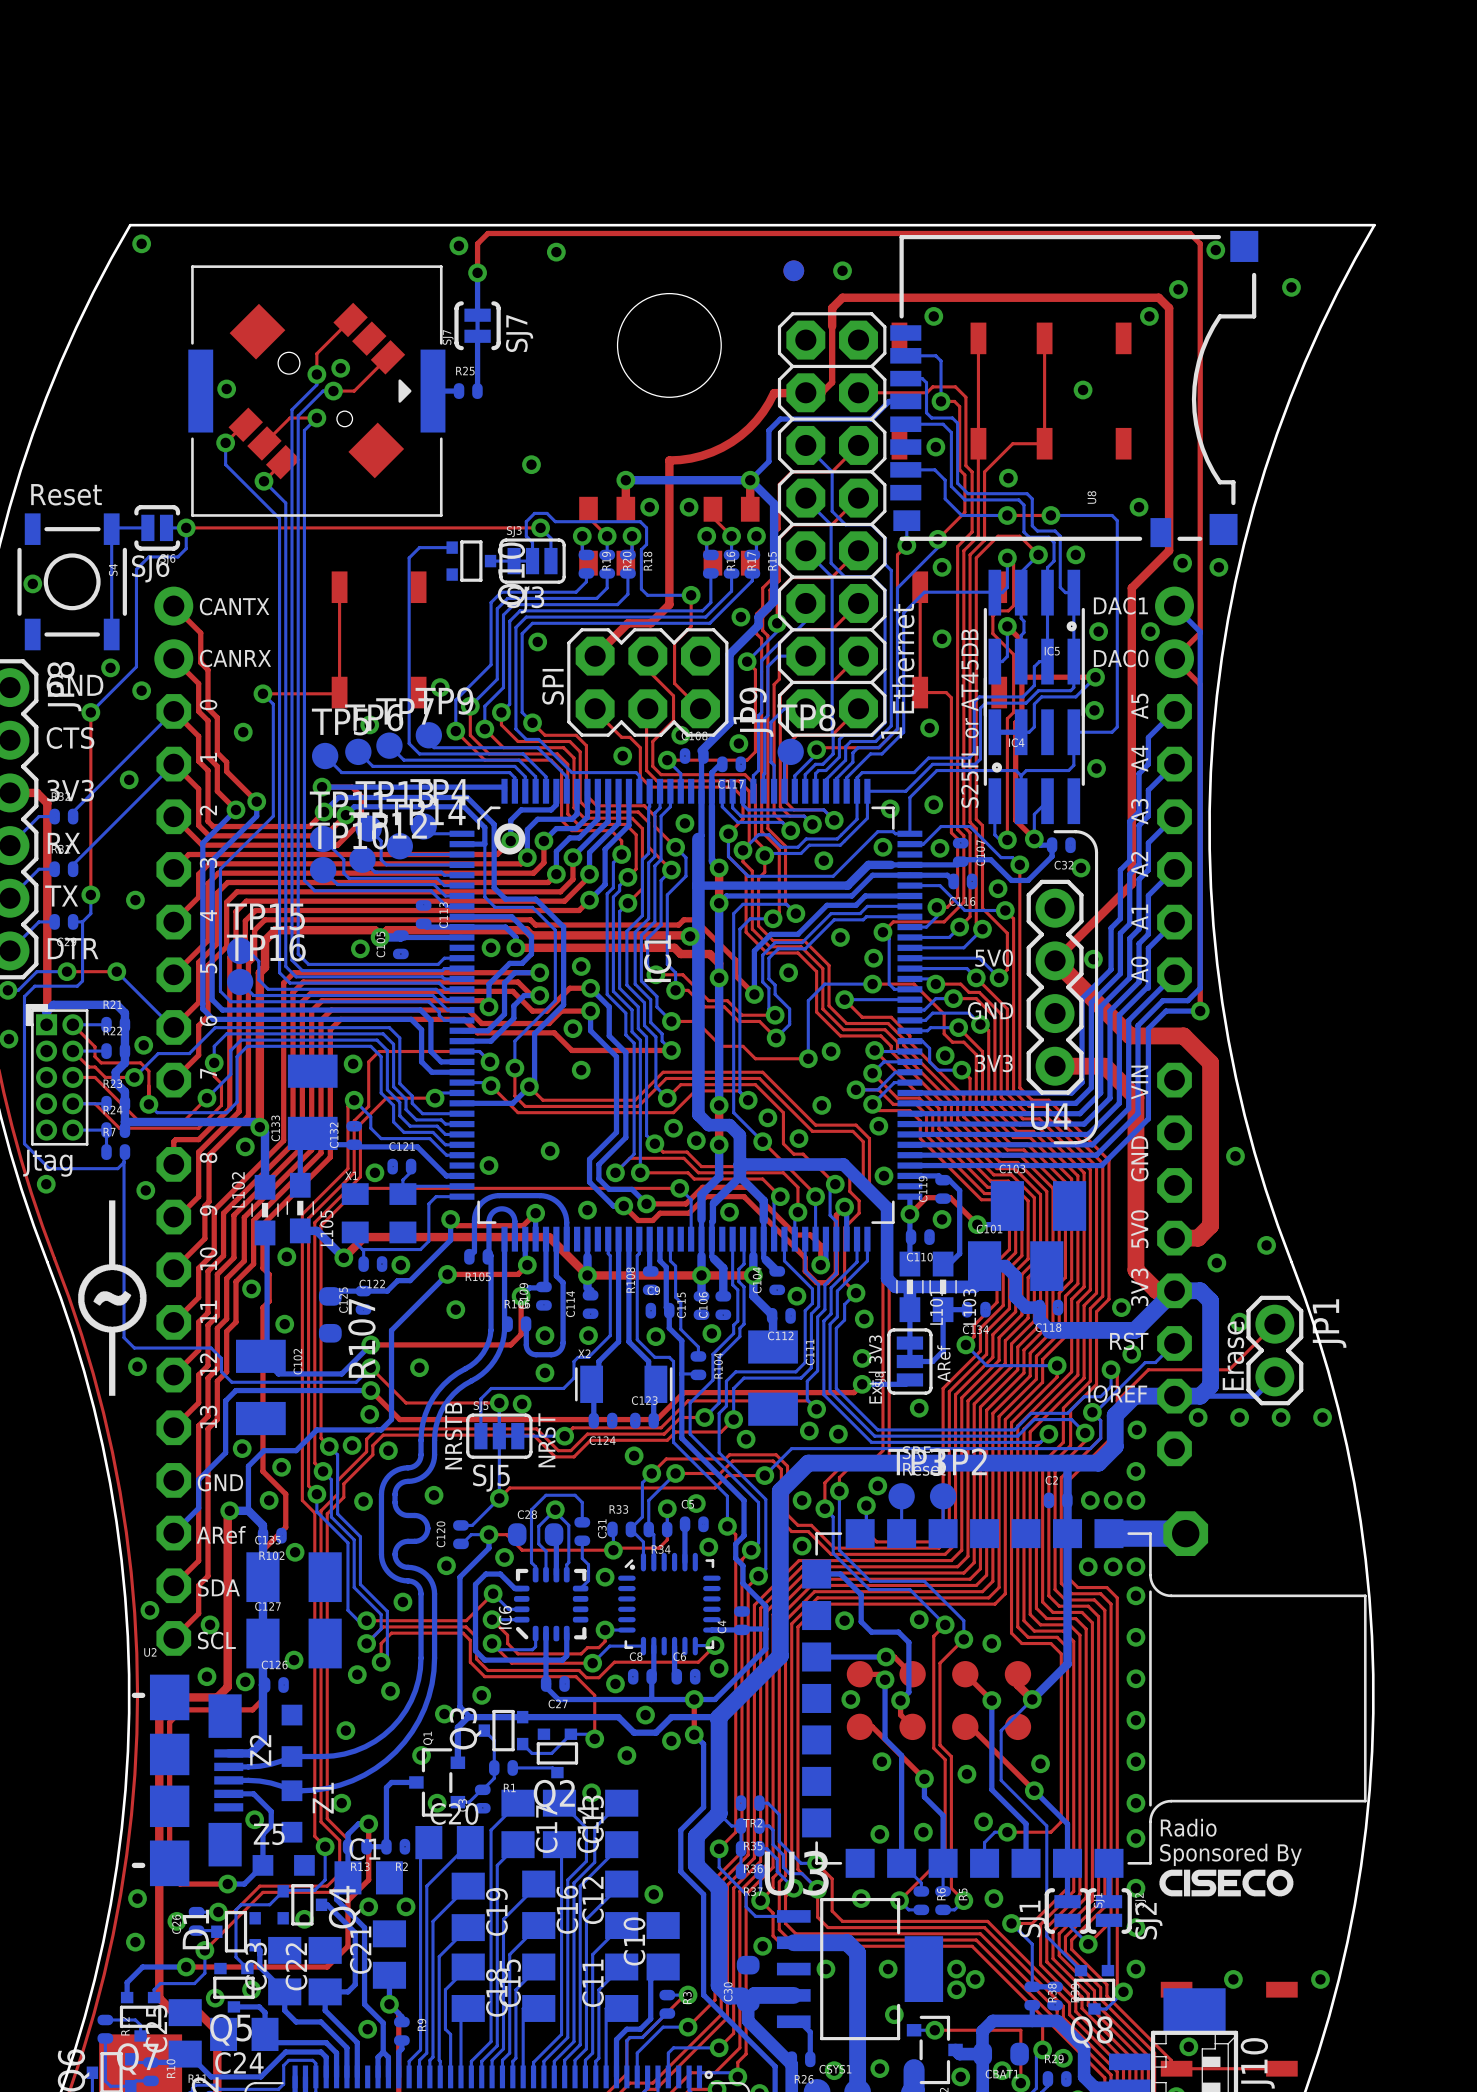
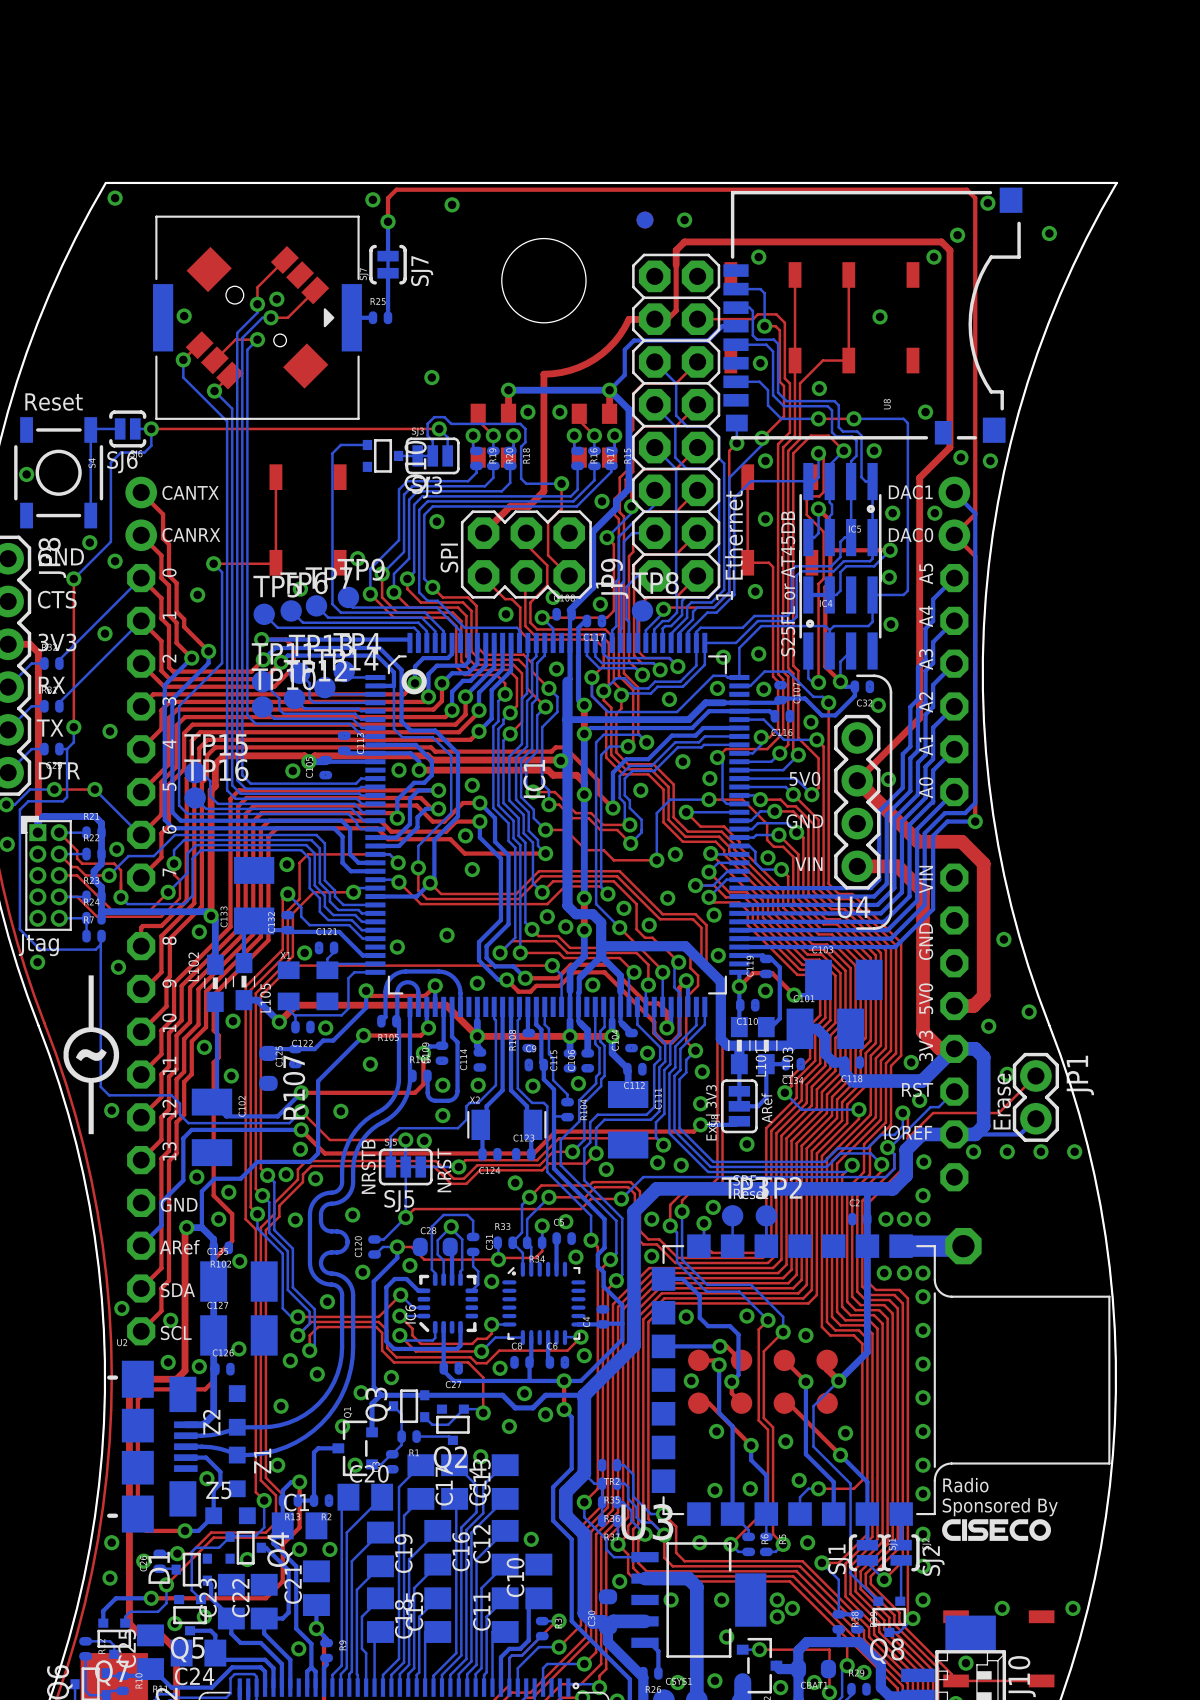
text: none -> 5V0 (804, 778)
U4 text: 5V0 (994, 958) -> none
U4 text: 3V3 (994, 1063) -> VIN (808, 864)

